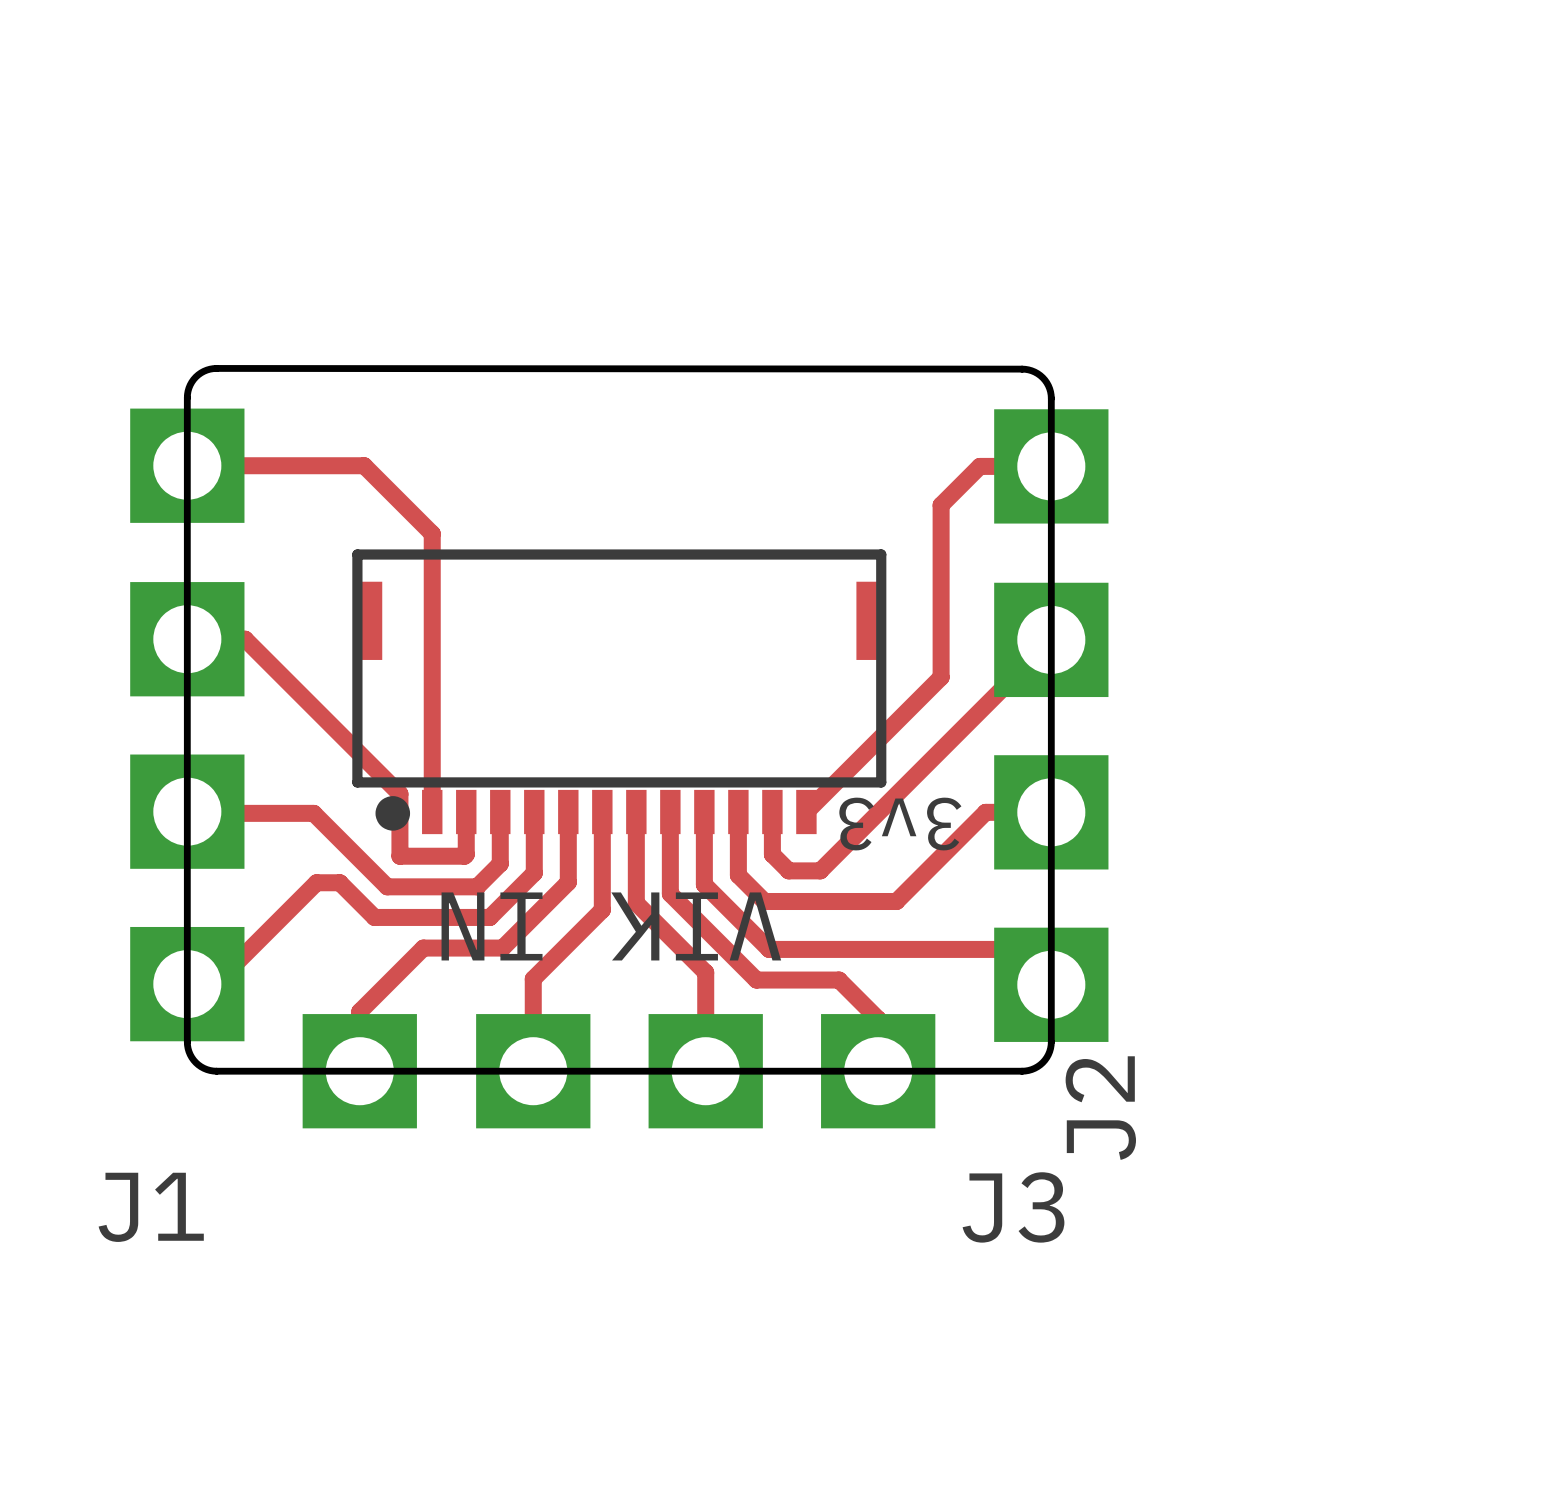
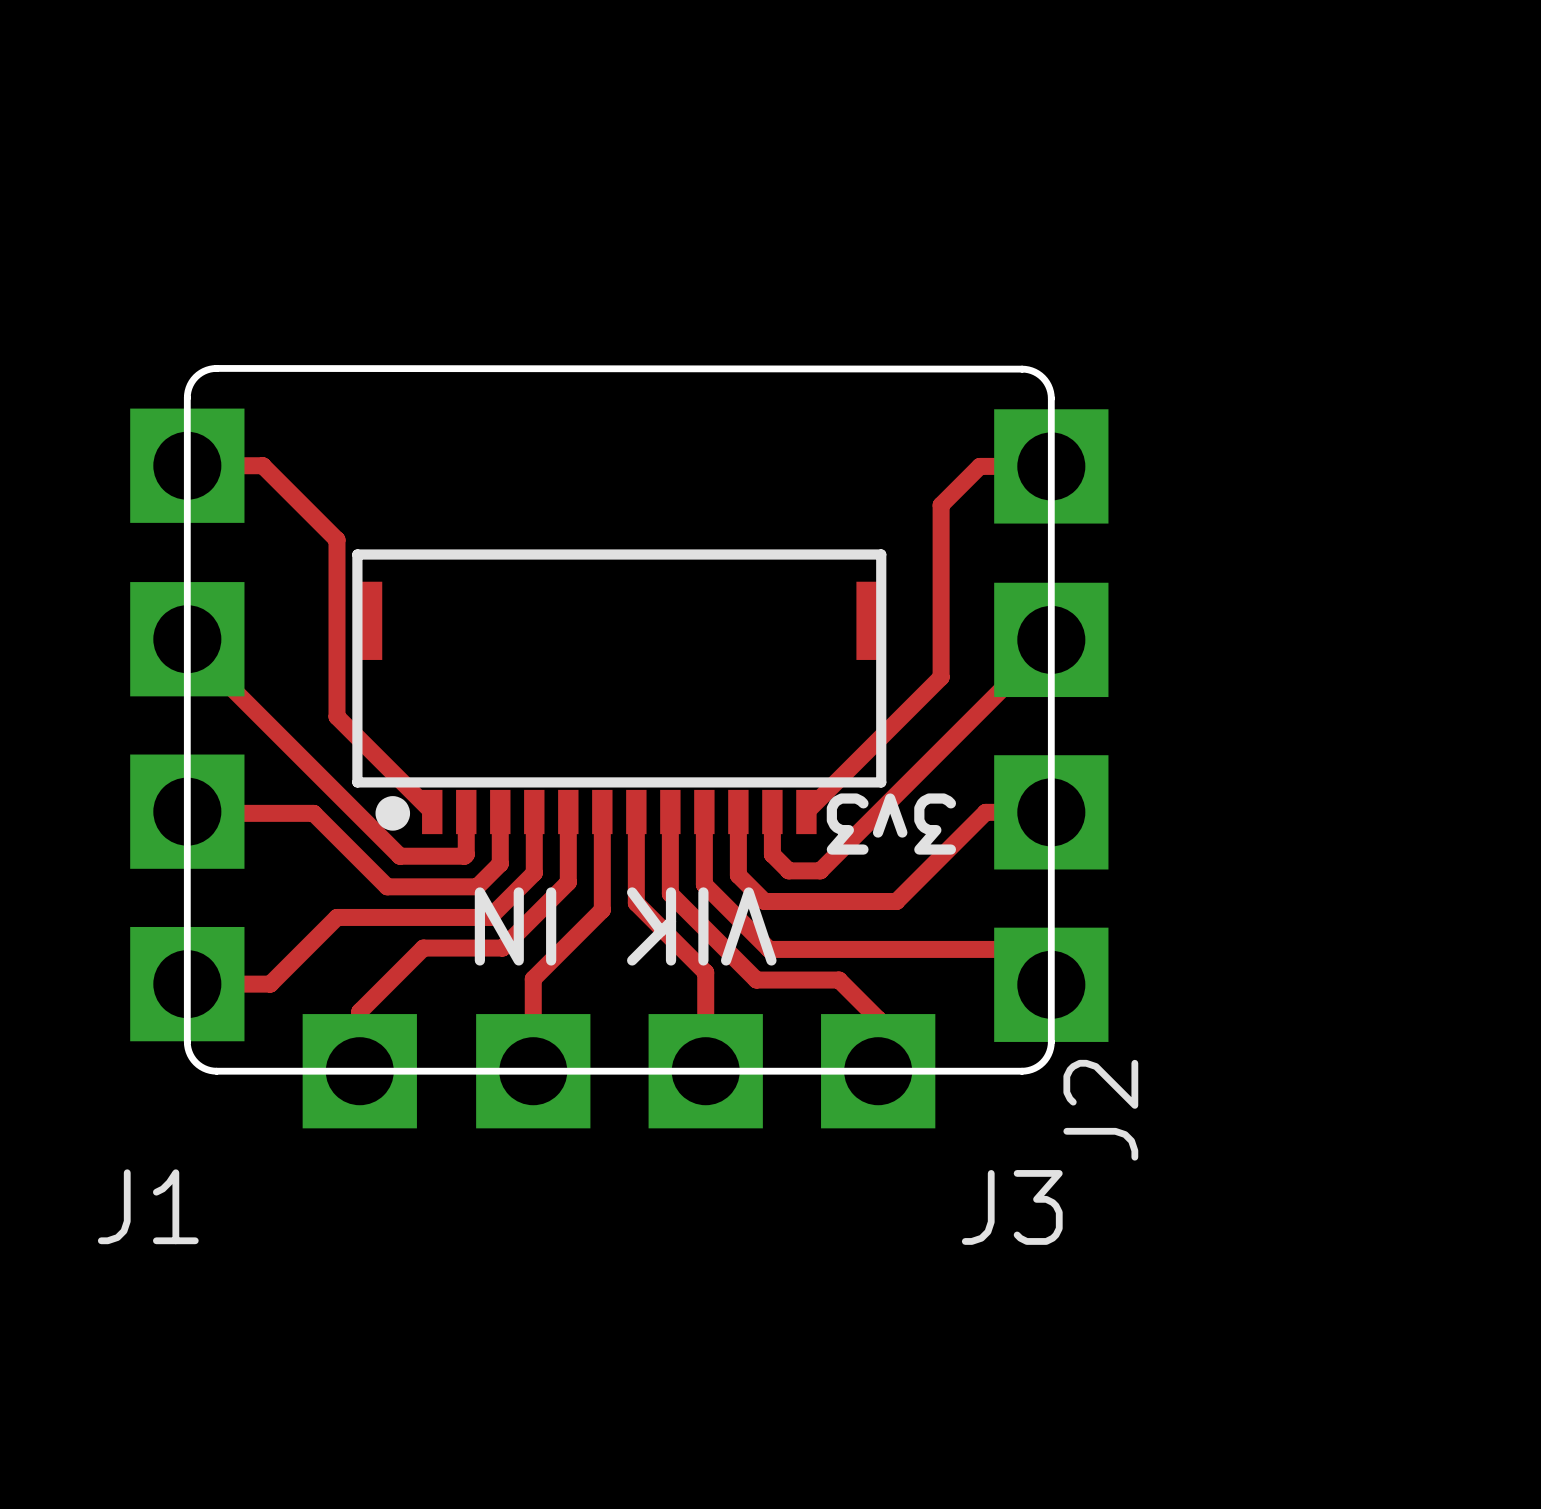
track: (262, 465) (364, 465) (432, 533) (432, 812) -> (262, 465) (337, 539) (337, 716) (432, 812)
track: (187, 639) (245, 639) (399, 793) (399, 856) -> (195, 639) (195, 652) (399, 856)
track: (374, 917) (339, 882) (316, 882) (215, 984) -> (374, 917) (337, 917) (270, 984) (215, 984)

